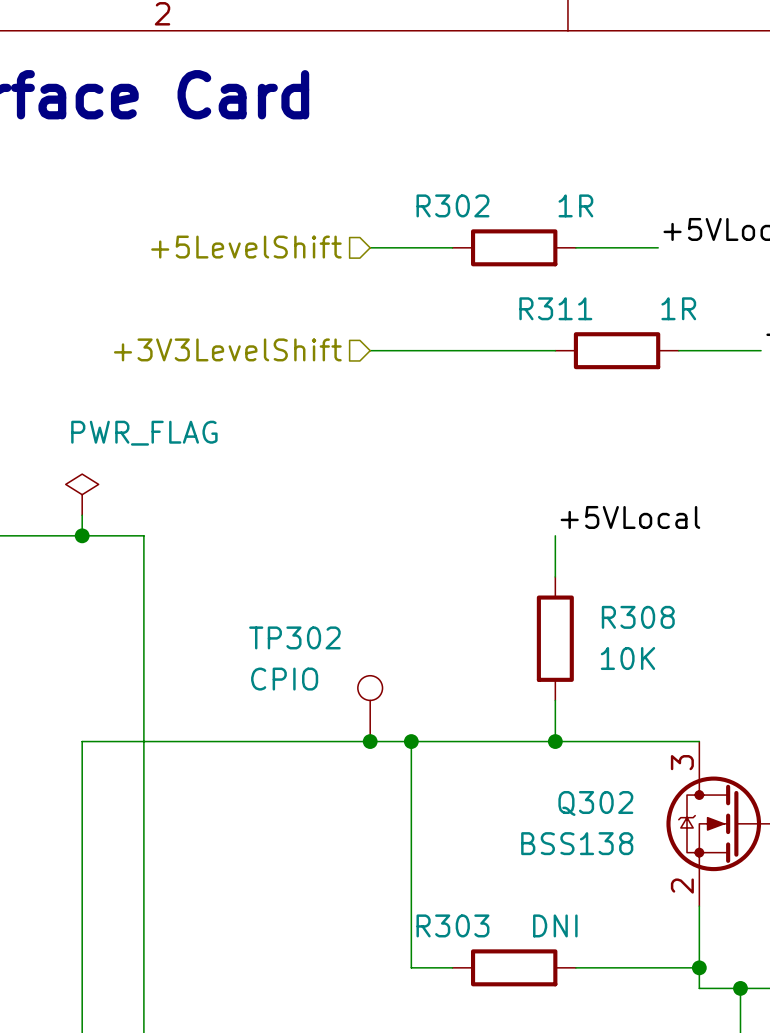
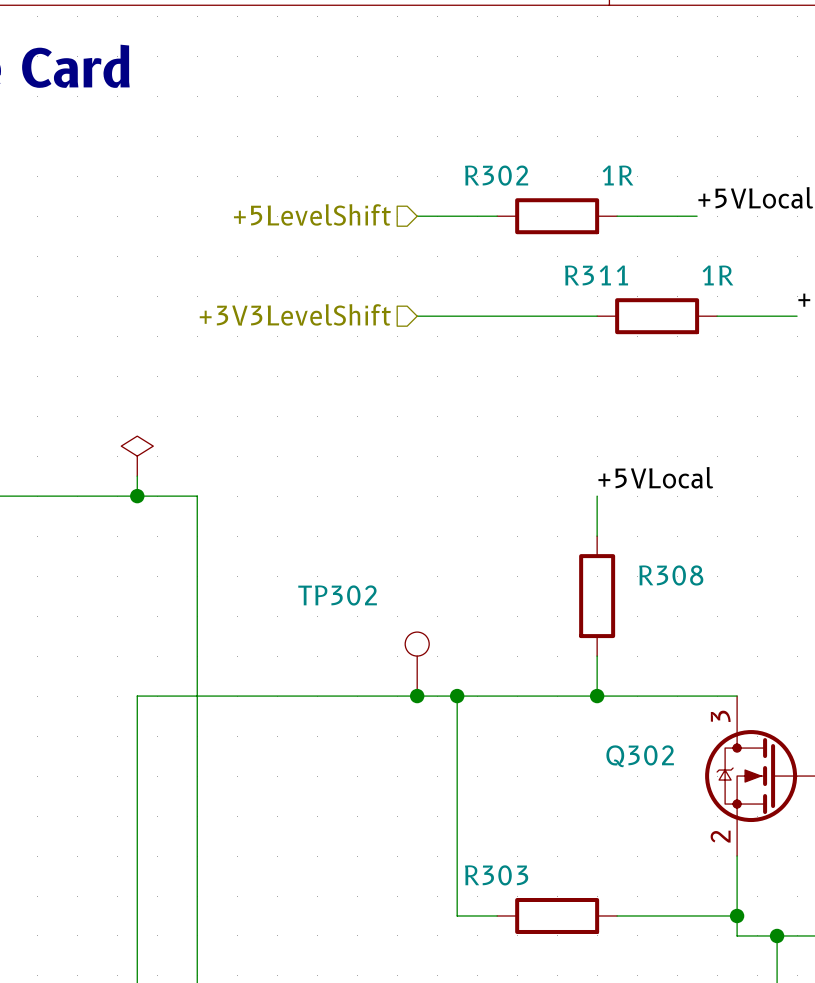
power symbol text: PWR_FLAG (144, 433) -> none
R308 value: 10K (627, 658) -> none
TP302 value: CPIO (284, 679) -> none
Q302 value: BSS138 (577, 843) -> none
R303 value: DNI (555, 925) -> none

